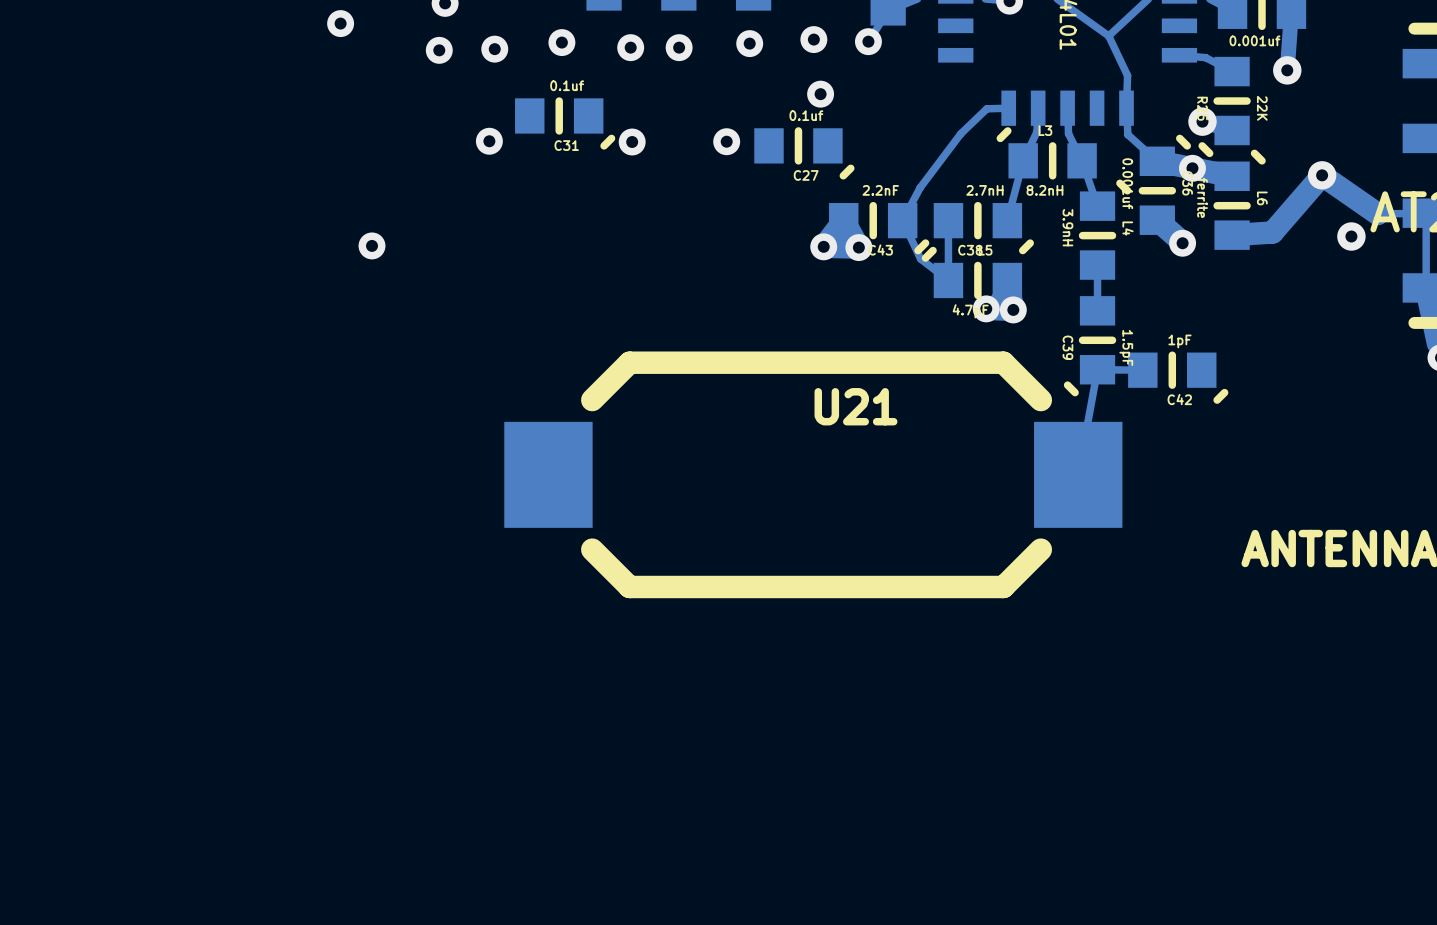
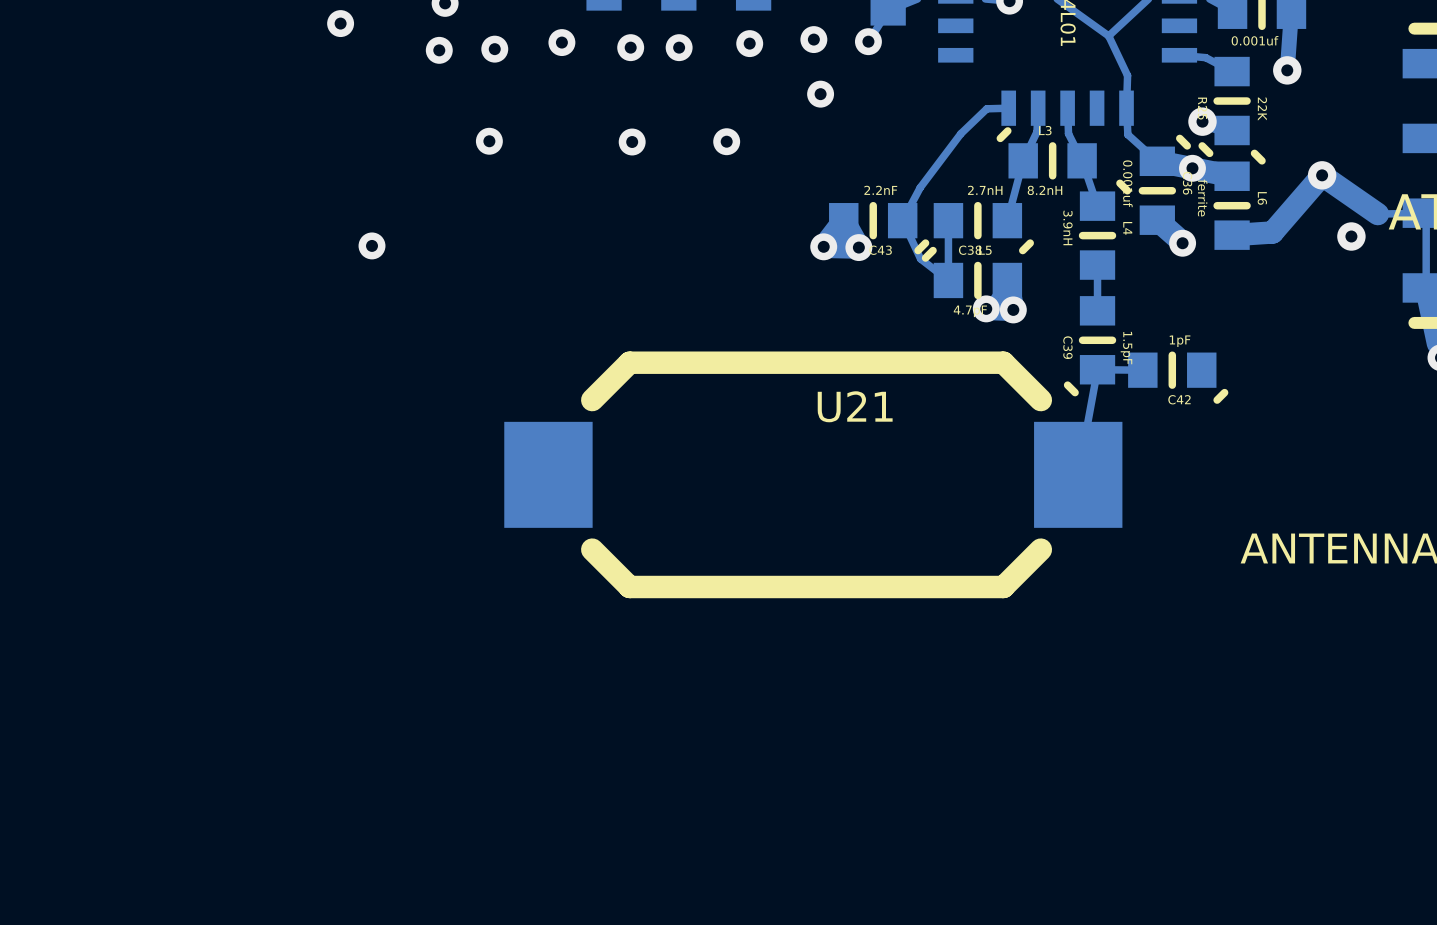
C31: 0.1uf (565, 123) -> none
C27: 0.1uf (804, 153) -> none

